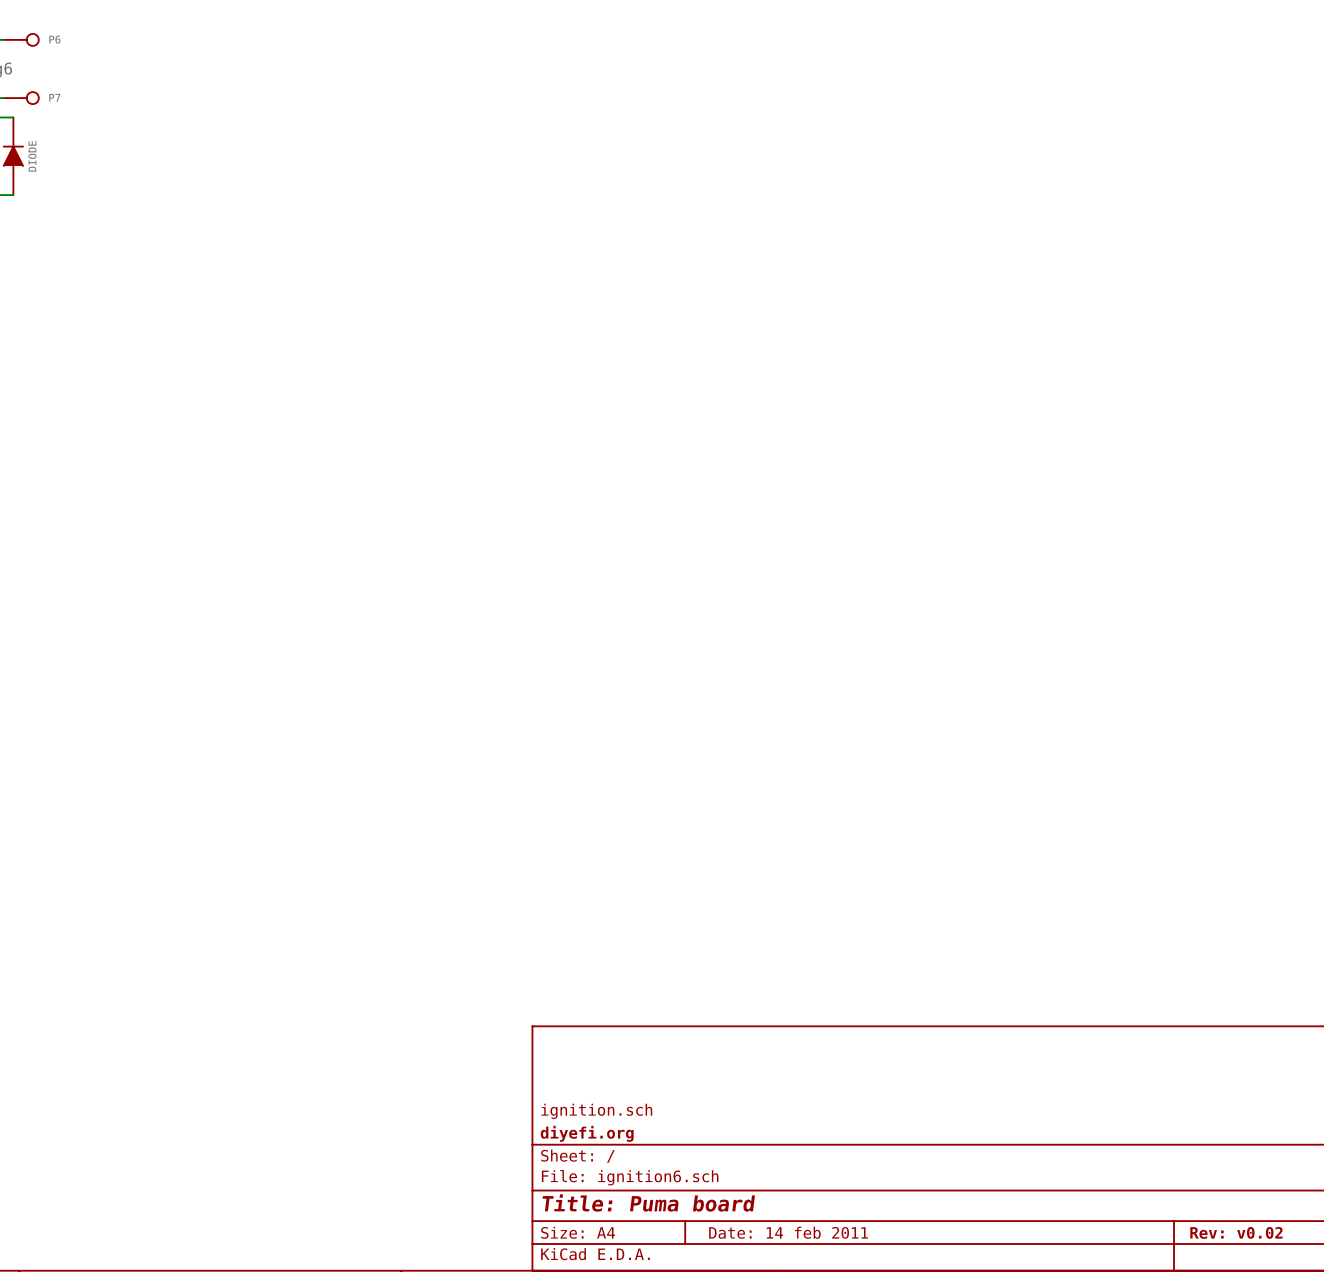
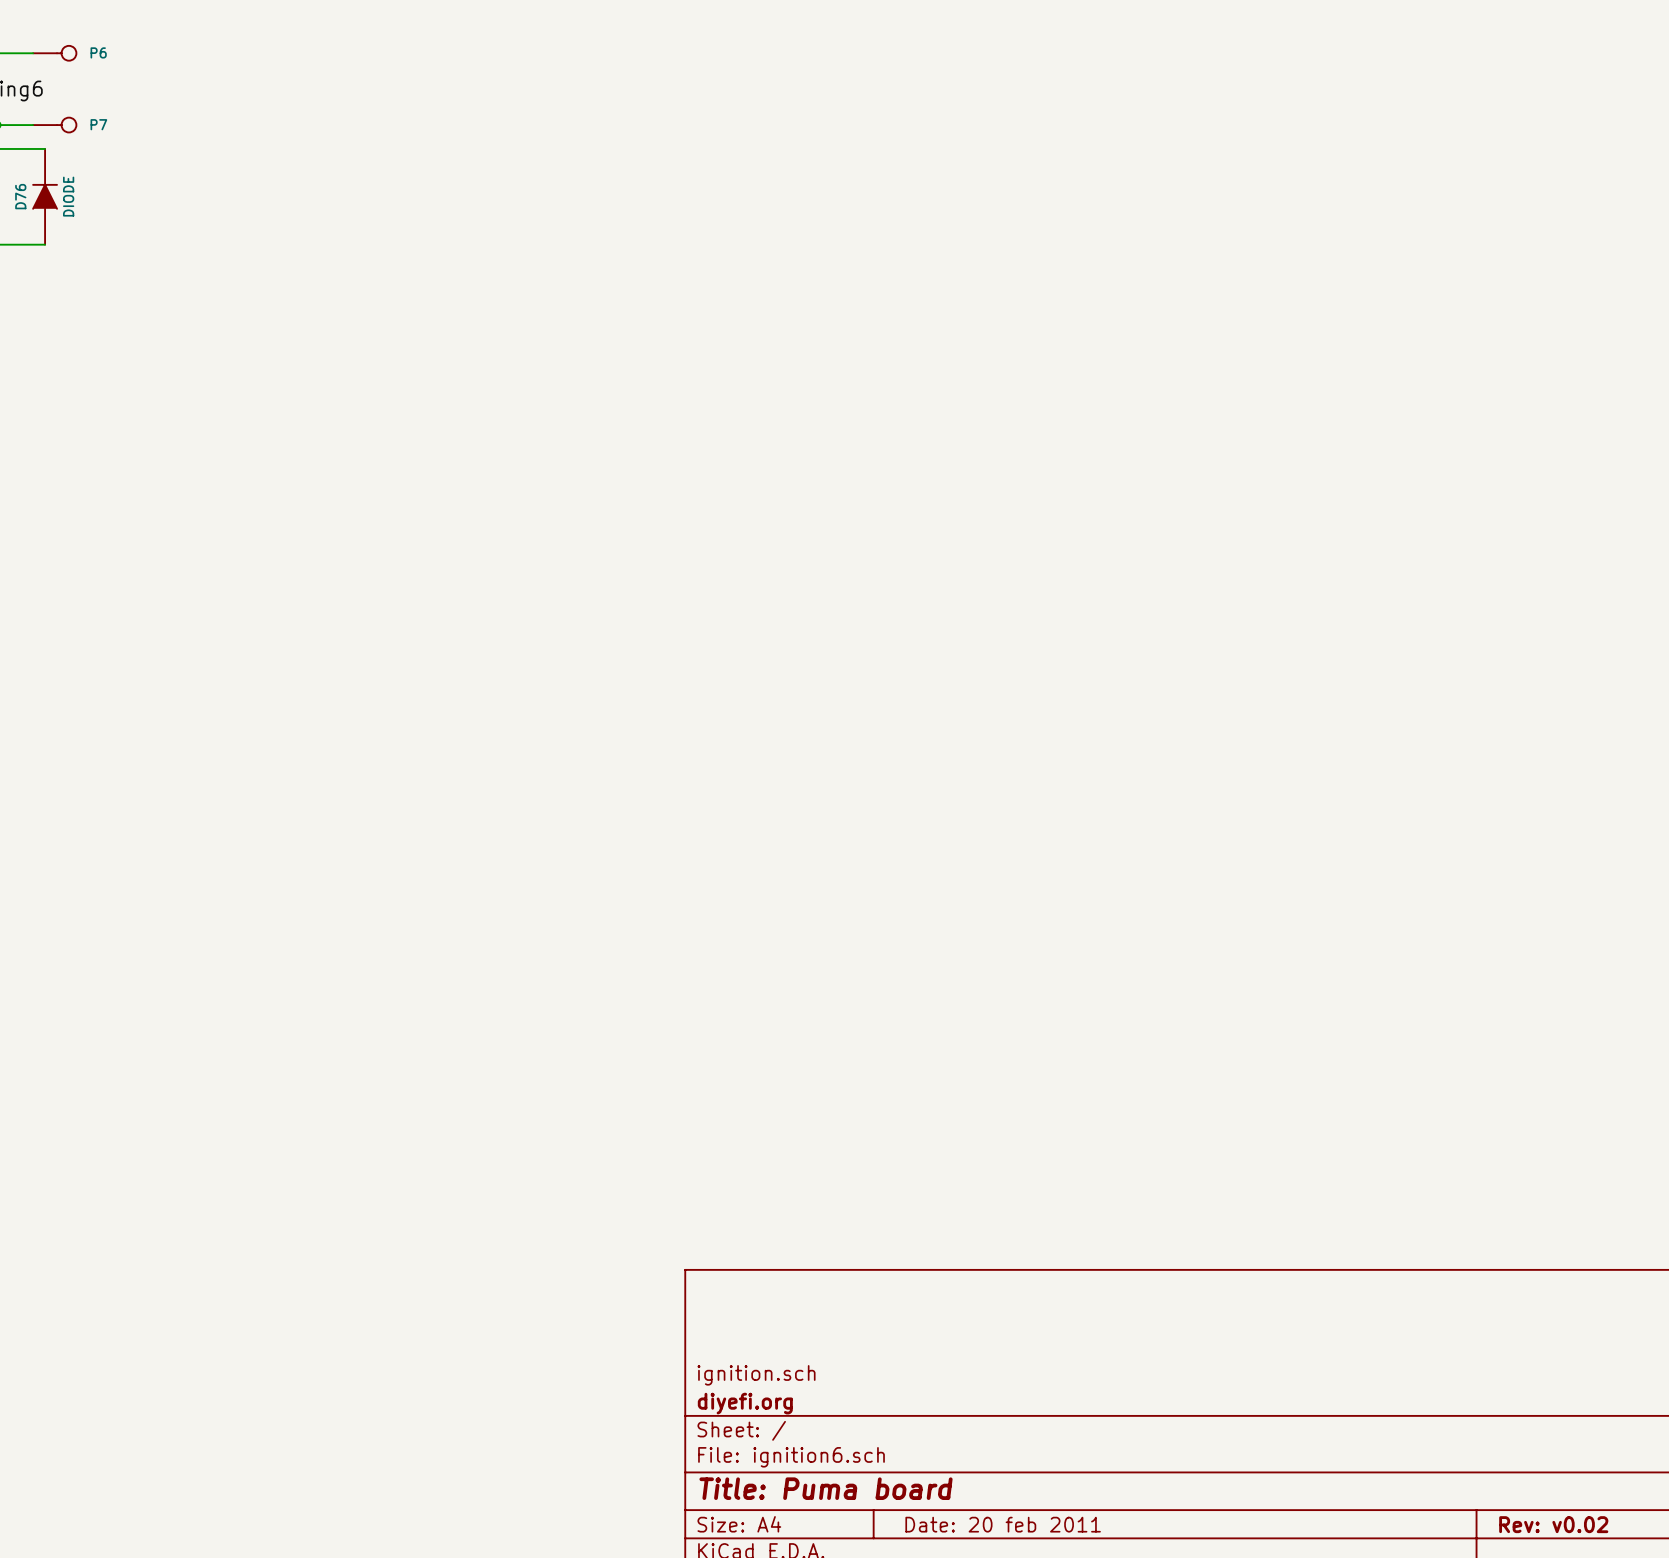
title block: Date: 14 feb 2011 (788, 1232) -> Date: 20 feb 2011 (1003, 1524)

